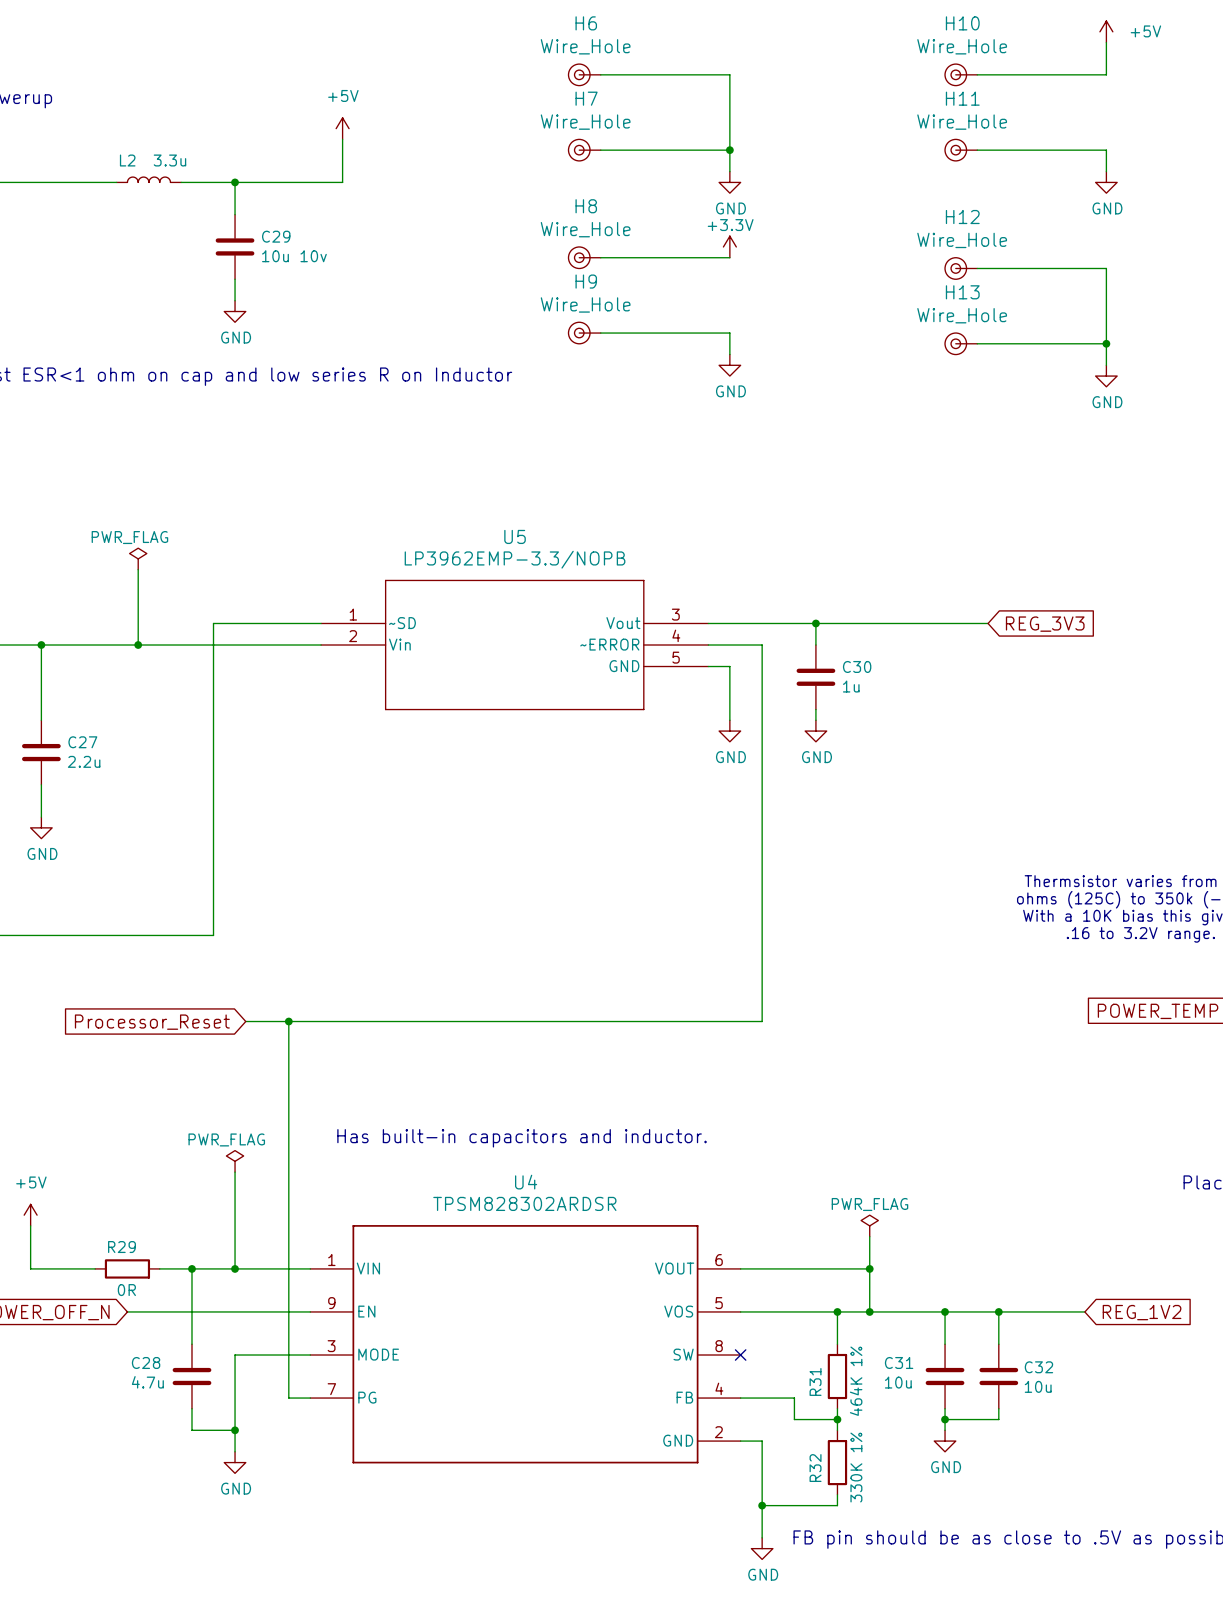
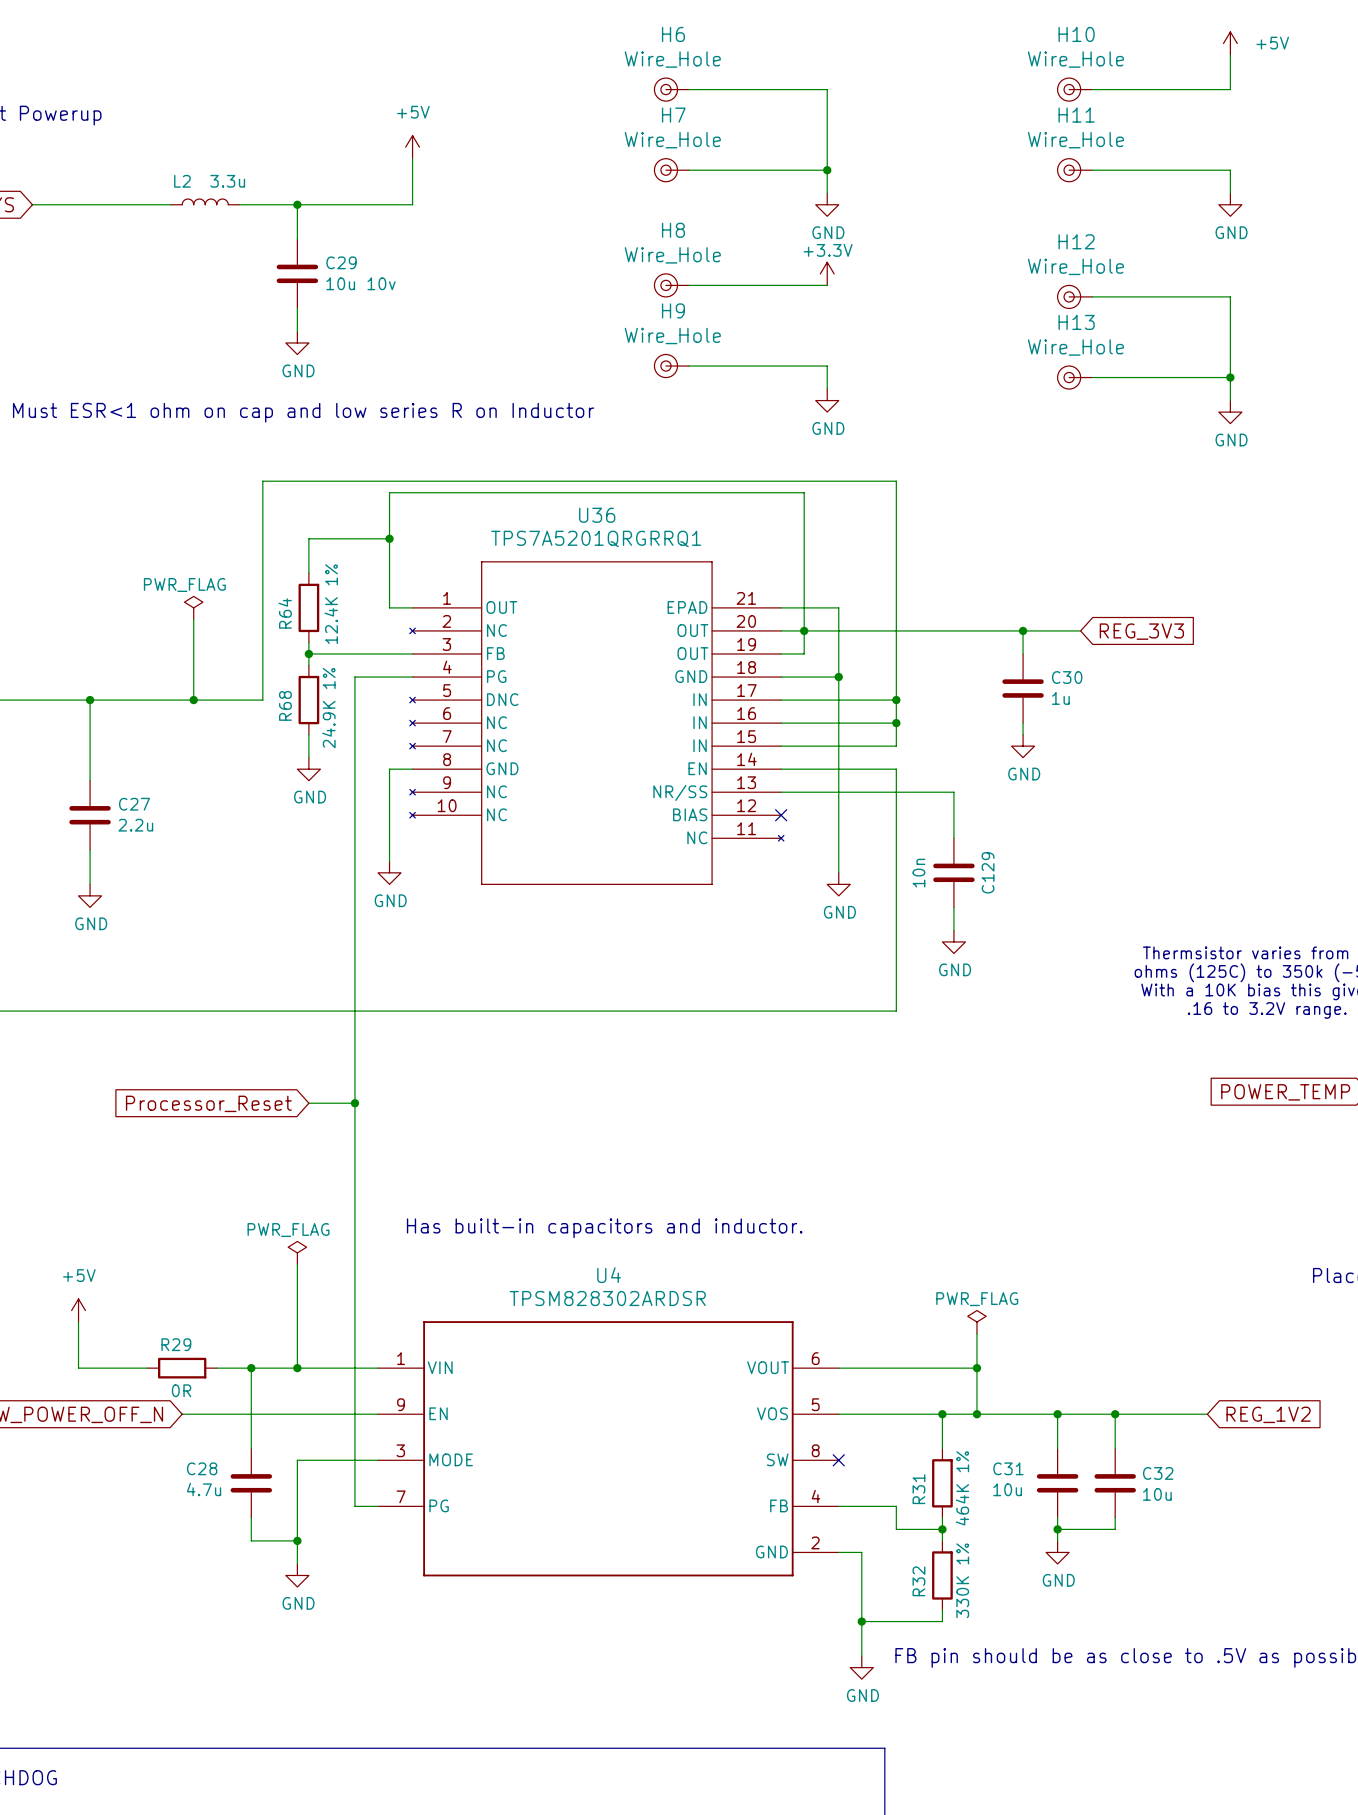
wire: none -> (389, 538) (308, 538) (308, 573)
junction: none -> (389, 538)
R64: none -> 12.4K 1% (308, 607)
wire: none -> (412, 607) (389, 607) (389, 492) (804, 492) (804, 653) (781, 653)
wire: none -> (781, 607) (838, 607) (838, 872)
wire: none -> (781, 630) (1080, 630)
junction: none -> (804, 630)
junction: none -> (1023, 630)
wire: none -> (308, 642) (308, 665)
wire: none -> (308, 653) (412, 653)
junction: none -> (308, 653)
wire: (288, 623) (213, 623) (213, 935) -> (354, 677) (354, 1103)
wire: (740, 623) (988, 623) -> none
junction: none -> (838, 677)
wire: (815, 623) (815, 645) -> (1023, 630) (1023, 653)
junction: (815, 623) -> none
global label position: REG_3V3 (1045, 624) -> REG_3V3 (1141, 631)
wire: (202, 645) (321, 645) -> (262, 700) (262, 481) (896, 481) (896, 746) (781, 746)
R68: none -> 24.9K 1% (308, 700)
U5: LP3962EMP-3.3/NOPB (514, 645) -> none
wire: (762, 645) (762, 1021) (288, 1021) -> (861, 700) (896, 700)
junction: none -> (896, 700)
U36: none -> TPS7A5201QRGRRQ1 (596, 723)
wire: (729, 666) (729, 720) -> (827, 723) (896, 723)
junction: none -> (896, 723)
wire: none -> (308, 734) (308, 757)
C30 position: (815, 677) -> (1023, 688)
power symbol: none -> GND (1023, 746)
power symbol: none -> GND (308, 769)
wire: none -> (412, 769) (389, 769) (389, 861)
wire: none -> (781, 769) (896, 769) (896, 1011) (274, 1011)
wire: (815, 709) (815, 720) -> (1023, 723) (1023, 734)
wire: none -> (781, 792) (953, 792) (953, 838)
power symbol: GND (729, 731) -> none
power symbol: GND (815, 731) -> none
no-connect mark: none -> (781, 815)
power symbol: none -> GND (389, 872)
C129: none -> 10n (953, 872)
power symbol: none -> GND (838, 884)
wire: none -> (953, 907) (953, 930)
power symbol: none -> GND (953, 941)

